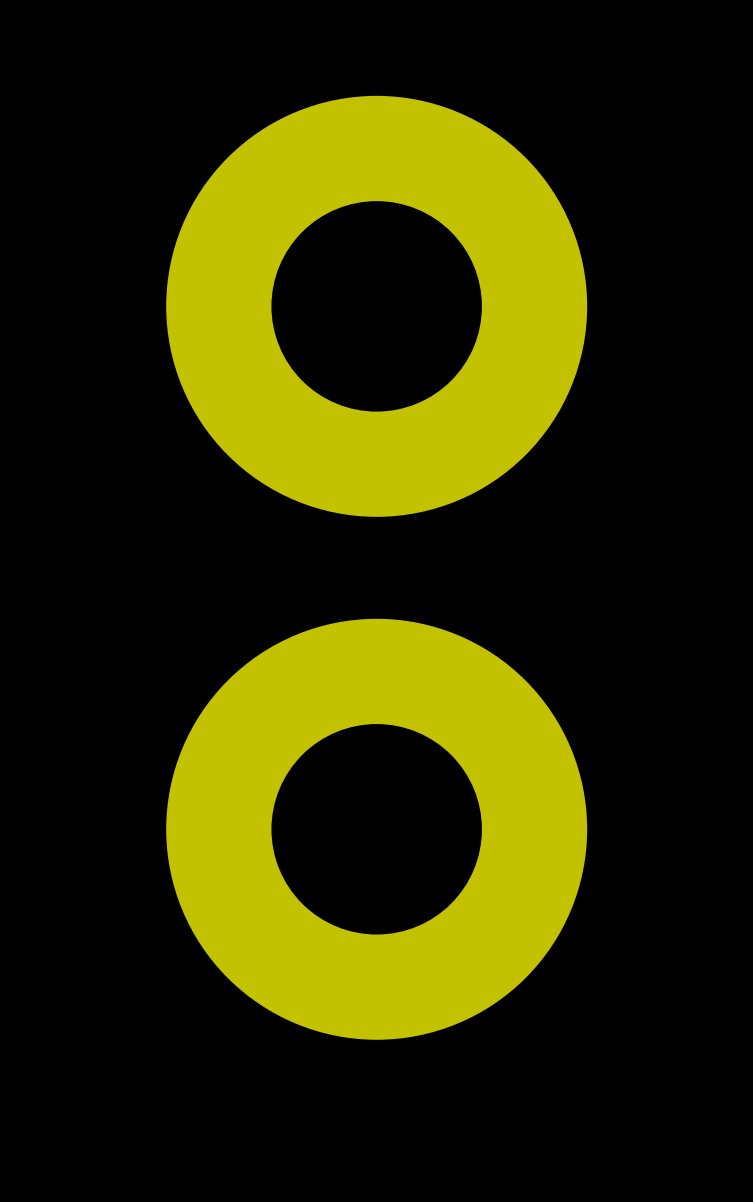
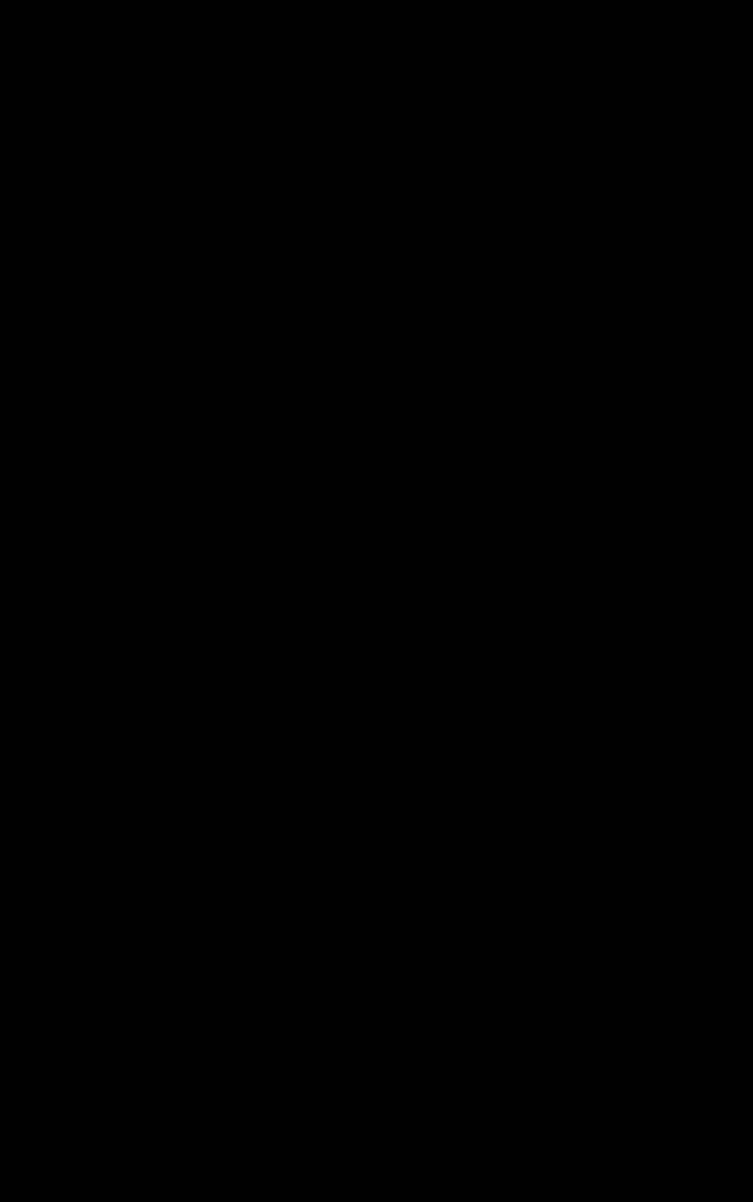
part: (376, 306) -> none
part: (376, 829) -> none

